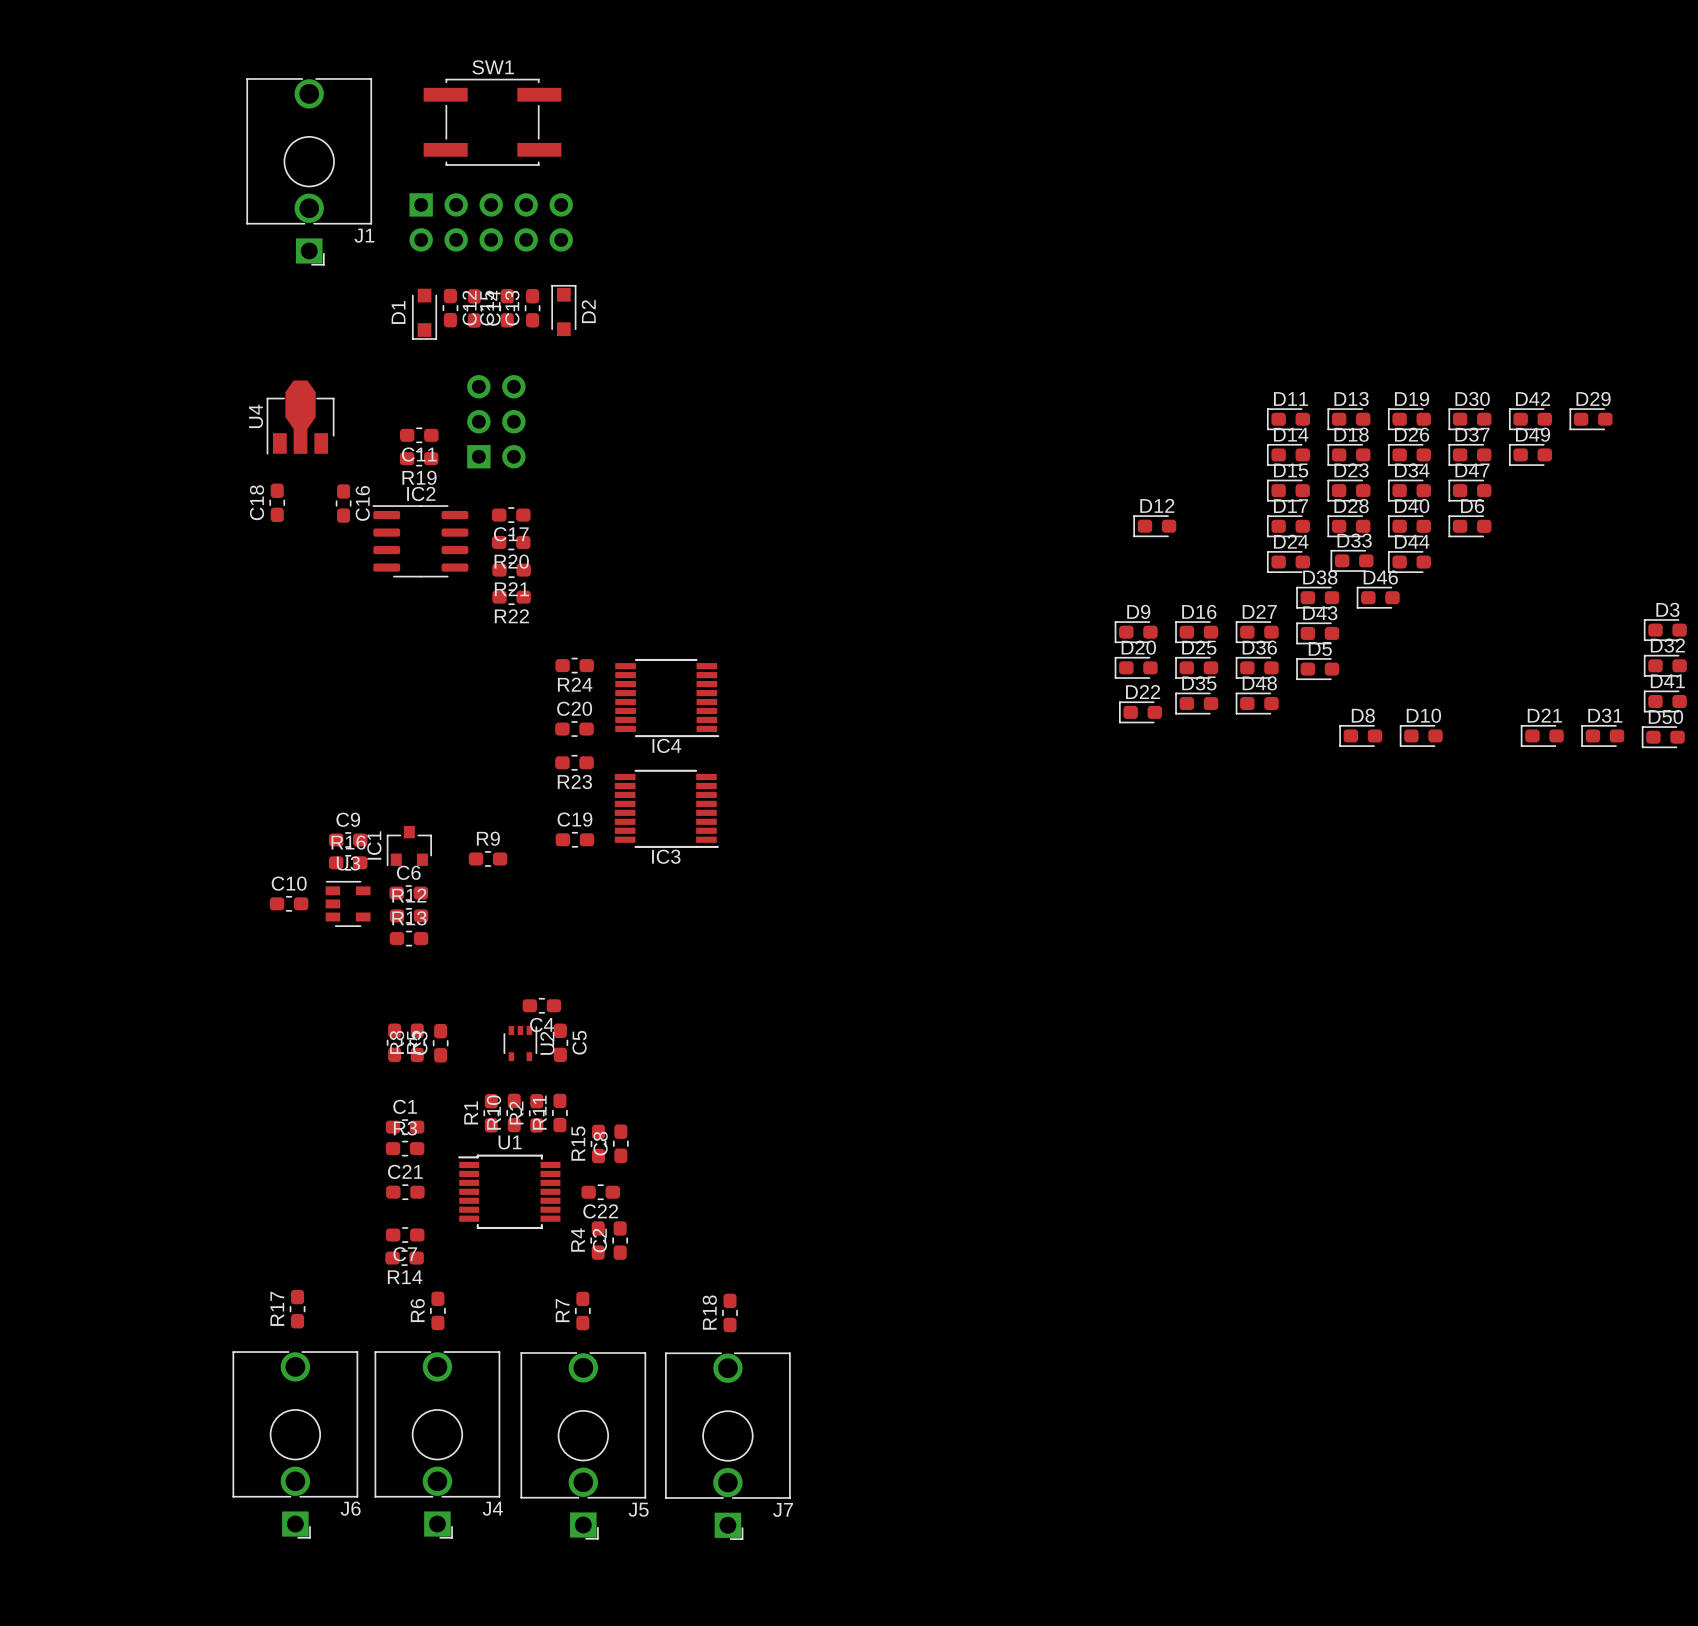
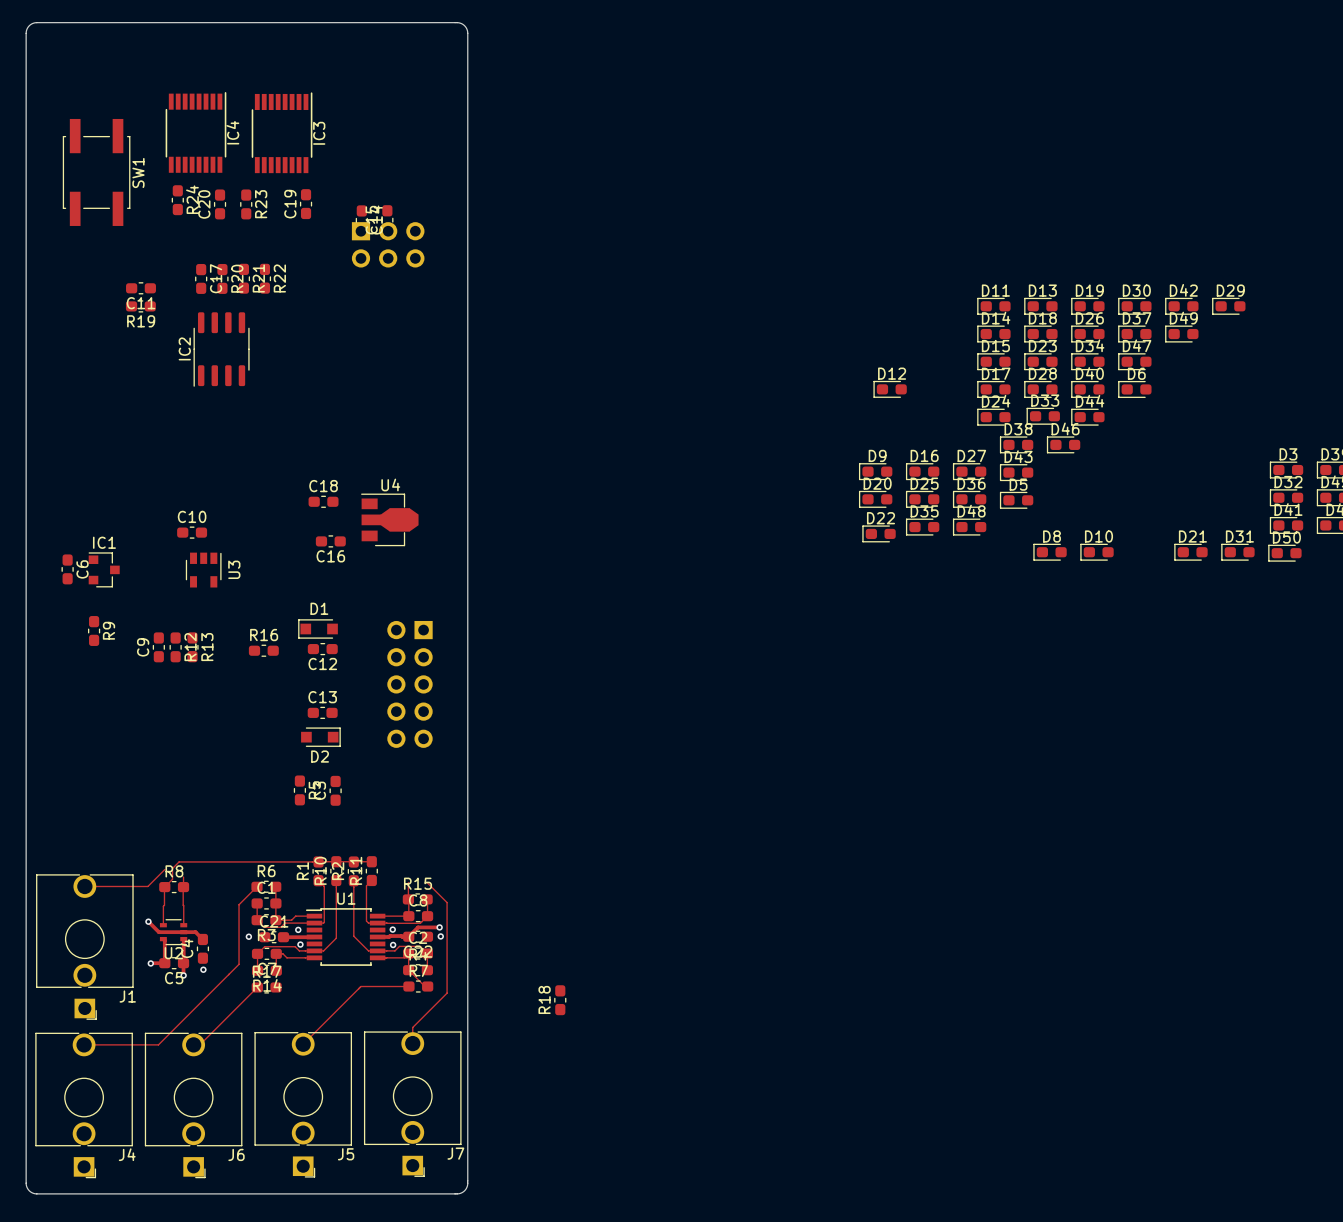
board edge: none -> (36, 22) (457, 22) (462, 24) (466, 29) (467, 1183) (466, 1188) (461, 1193) (36, 1193) (30, 1191) (26, 1187) (26, 33) (29, 25) (36, 22)
SW1 rotation: 0° (492, 122) -> 90° clockwise (96, 172)
SW1 position: (492, 122) -> (96, 172)
J1 position: (309, 171) -> (84, 947)
part: (491, 222) -> none
C12 rotation: 0° (450, 308) -> 90° clockwise (322, 649)
C12 position: (450, 308) -> (322, 649)
C13 rotation: 0° (532, 308) -> 90° clockwise (322, 712)
C13 position: (532, 308) -> (322, 712)
D2 rotation: 0° (563, 310) -> 90° clockwise (320, 737)
D2 position: (563, 310) -> (320, 737)
D1 rotation: 0° (424, 314) -> 90° clockwise (318, 628)
D1 position: (424, 314) -> (318, 628)
U4 rotation: 0° (300, 417) -> 90° clockwise (389, 519)
U4 position: (300, 417) -> (389, 519)
part rotation: 0° (496, 421) -> 90° clockwise (388, 244)
part position: (496, 421) -> (388, 244)
C11 position: (419, 435) -> (141, 288)
R19 position: (419, 458) -> (140, 306)
C18 rotation: 0° (277, 502) -> 90° clockwise (323, 501)
C18 position: (277, 502) -> (323, 501)
C16 rotation: 0° (343, 503) -> 90° clockwise (330, 541)
C16 position: (343, 503) -> (330, 541)
C17 rotation: 0° (511, 515) -> 90° clockwise (201, 278)
C17 position: (511, 515) -> (201, 278)
C17 name position: C17 (511, 534) -> C17 (216, 278)
IC2 rotation: 0° (420, 541) -> 90° counterclockwise (221, 349)
IC2 position: (420, 541) -> (221, 349)
R20 rotation: 0° (511, 542) -> 90° clockwise (222, 278)
R20 position: (511, 542) -> (222, 278)
R20 name position: R20 (511, 561) -> R20 (237, 278)
R21 rotation: 0° (511, 570) -> 90° clockwise (243, 278)
R21 position: (511, 570) -> (243, 278)
R21 name position: R21 (511, 589) -> R21 (258, 278)
R22 rotation: 0° (511, 597) -> 90° clockwise (264, 278)
R22 position: (511, 597) -> (264, 278)
R22 name position: R22 (511, 616) -> R22 (279, 278)
R24 rotation: 0° (574, 665) -> 90° clockwise (177, 200)
R24 position: (574, 665) -> (177, 200)
R24 name position: R24 (575, 684) -> R24 (192, 199)
IC4 rotation: 0° (667, 698) -> 90° counterclockwise (195, 132)
IC4 position: (667, 698) -> (195, 132)
C20 name position: C20 (574, 708) -> C20 (204, 204)
C20 rotation: 0° (574, 729) -> 90° clockwise (220, 204)
C20 position: (574, 729) -> (220, 204)
R23 rotation: 0° (574, 762) -> 90° clockwise (246, 204)
R23 position: (574, 762) -> (246, 204)
R23 name position: R23 (574, 781) -> R23 (261, 204)
IC3 rotation: 0° (666, 808) -> 90° counterclockwise (282, 132)
IC3 position: (666, 808) -> (282, 132)
C9 name position: C9 (348, 819) -> C9 (143, 647)
C19 name position: C19 (574, 819) -> C19 (290, 204)
C19 rotation: 0° (574, 839) -> 90° clockwise (306, 204)
C19 position: (574, 839) -> (306, 204)
C9 rotation: 0° (348, 840) -> 90° clockwise (158, 647)
C9 position: (348, 840) -> (158, 647)
IC1 rotation: 0° (409, 846) -> 90° clockwise (104, 569)
IC1 position: (409, 846) -> (104, 569)
R9 rotation: 0° (488, 858) -> 90° clockwise (94, 631)
R9 position: (488, 858) -> (94, 631)
C6 rotation: 0° (408, 893) -> 90° clockwise (67, 569)
C6 position: (408, 893) -> (67, 569)
C10 position: (289, 903) -> (192, 532)
U3 rotation: 0° (348, 903) -> 90° clockwise (203, 570)
U3 position: (348, 903) -> (203, 570)
part: none -> (409, 684)
R12 rotation: 0° (409, 915) -> 90° clockwise (175, 647)
R12 position: (409, 915) -> (175, 647)
R13 rotation: 0° (409, 938) -> 90° clockwise (192, 647)
R13 position: (409, 938) -> (192, 647)
C4 rotation: 0° (541, 1005) -> 90° clockwise (202, 948)
C4 position: (541, 1005) -> (202, 948)
R8 rotation: 0° (417, 1042) -> 90° clockwise (174, 887)
R8 position: (417, 1042) -> (174, 887)
C5 rotation: 0° (560, 1042) -> 90° clockwise (174, 963)
C5 position: (560, 1042) -> (174, 963)
U2 rotation: 0° (520, 1043) -> 90° clockwise (173, 932)
U2 position: (520, 1043) -> (173, 932)
R10 position: (514, 1112) -> (336, 871)
R11 position: (559, 1112) -> (371, 871)
R1 position: (491, 1113) -> (318, 871)
R2 position: (536, 1113) -> (353, 871)
C1 position: (405, 1127) -> (266, 903)
R3 name position: R3 (405, 1128) -> R3 (266, 935)
track: none -> (371, 861) (179, 861) (172, 868) (172, 879) (164, 887) (163, 925)
R15 rotation: 0° (598, 1143) -> 90° clockwise (417, 899)
R15 position: (598, 1143) -> (417, 899)
C8 rotation: 0° (620, 1143) -> 90° clockwise (418, 916)
C8 position: (620, 1143) -> (418, 916)
track: none -> (164, 869) (147, 886) (84, 886)
R3 position: (405, 1148) -> (266, 920)
track: none -> (183, 877) (183, 925)
track: none -> (318, 880) (324, 886) (323, 923) (285, 923) (280, 927) (264, 927) (257, 920) (257, 903)
track: none -> (336, 880) (336, 938) (323, 950) (299, 950) (295, 946) (264, 946) (257, 953) (257, 970)
track: none -> (371, 880) (366, 885) (366, 921) (368, 923) (420, 923) (427, 916) (427, 899)
track: none -> (353, 880) (353, 936) (368, 950) (394, 950) (399, 946) (420, 946) (427, 953) (427, 970)
track: none -> (408, 882) (408, 916)
track: none -> (427, 882) (447, 902) (447, 993) (412, 1027) (412, 1043)
track: none -> (257, 886) (239, 904) (239, 964) (158, 1044) (84, 1044)
track: none -> (275, 886) (275, 920) (291, 920) (295, 916) (314, 916)
U1 position: (509, 1191) -> (345, 936)
C21 position: (405, 1192) -> (274, 937)
C22 position: (600, 1192) -> (418, 936)
track: none -> (377, 916) (408, 916)
track: none -> (148, 921) (158, 932) (195, 932) (202, 939)
via: none -> (148, 921)
track: none -> (439, 927) (418, 927) (408, 936) (377, 936)
via: none -> (439, 927)
via: none -> (392, 929)
via: none -> (298, 929)
via: none -> (440, 936)
via: none -> (248, 936)
track: none -> (314, 936) (283, 937)
track: none -> (163, 939) (164, 963) (150, 963)
track: none -> (183, 939) (183, 975)
C7 position: (405, 1235) -> (266, 953)
R4 rotation: 0° (598, 1240) -> 90° clockwise (418, 970)
R4 position: (598, 1240) -> (418, 970)
C2 rotation: 0° (620, 1240) -> 90° clockwise (418, 953)
C2 position: (620, 1240) -> (418, 953)
via: none -> (300, 944)
via: none -> (393, 944)
R14 position: (404, 1258) -> (266, 970)
track: none -> (314, 957) (286, 957) (282, 953) (276, 953) (276, 970)
track: none -> (377, 957) (404, 957) (408, 953) (408, 970) (424, 986) (427, 986)
via: none -> (150, 963)
via: none -> (203, 969)
via: none -> (183, 975)
track: none -> (408, 986) (360, 986) (303, 1044)
track: none -> (257, 987) (199, 1044) (193, 1044)
R17 rotation: 0° (297, 1309) -> 90° clockwise (266, 987)
R17 position: (297, 1309) -> (266, 987)
R6 rotation: 0° (437, 1310) -> 90° clockwise (266, 886)
R6 position: (437, 1310) -> (266, 886)
R7 rotation: 0° (582, 1310) -> 90° clockwise (418, 986)
R7 position: (582, 1310) -> (418, 986)
J6 position: (295, 1444) -> (193, 1105)
J4 position: (437, 1444) -> (84, 1105)
J5 position: (583, 1445) -> (303, 1104)
J7 position: (727, 1446) -> (412, 1104)

